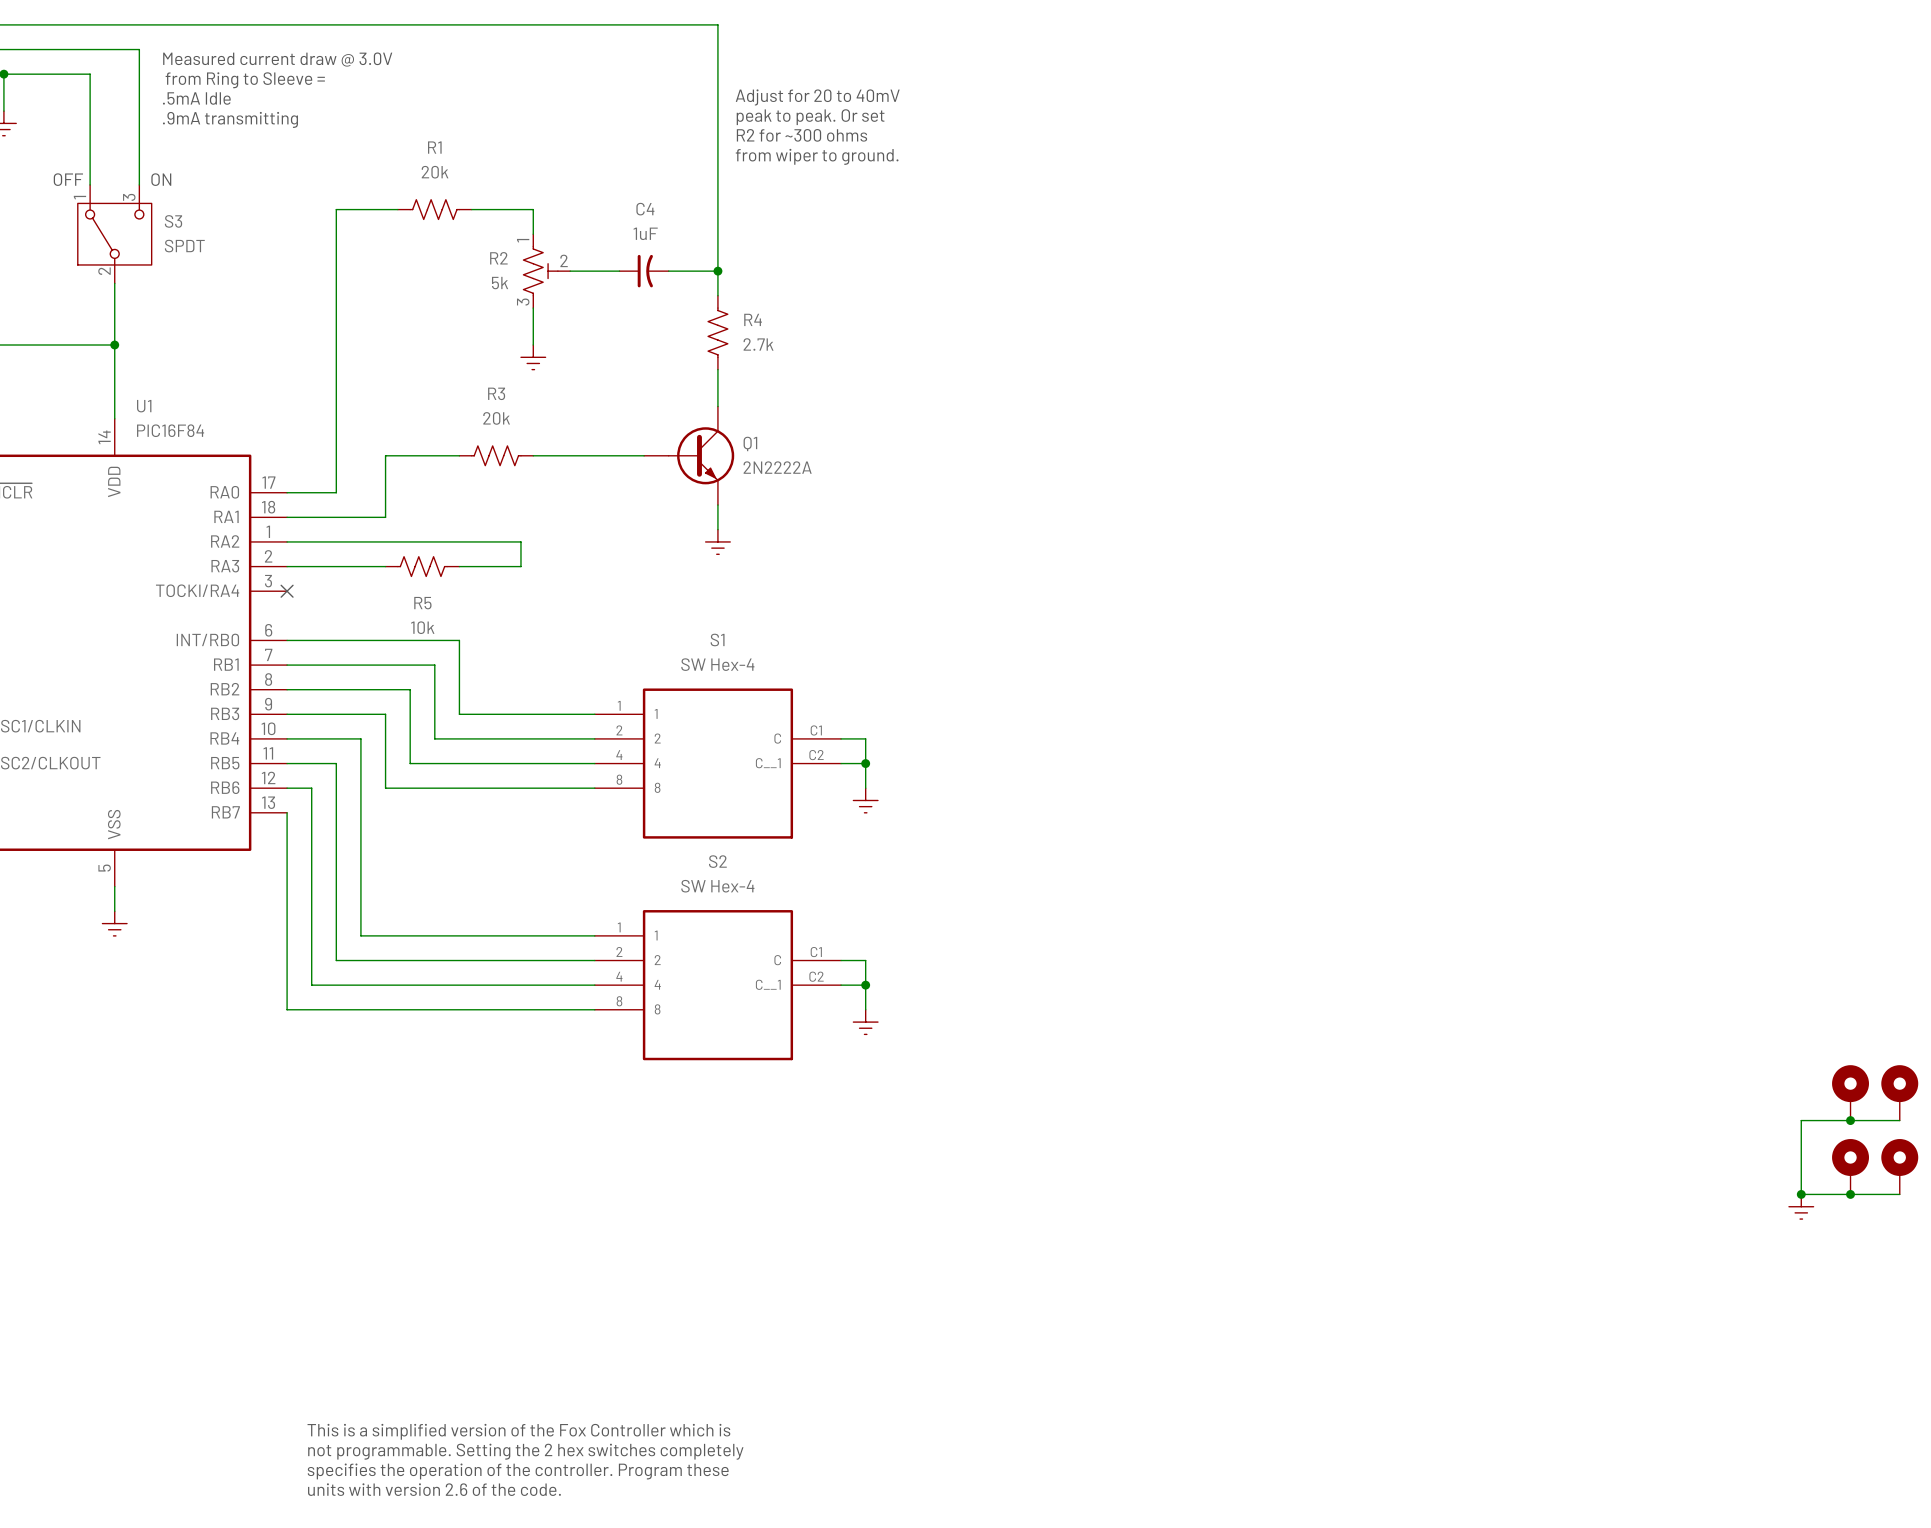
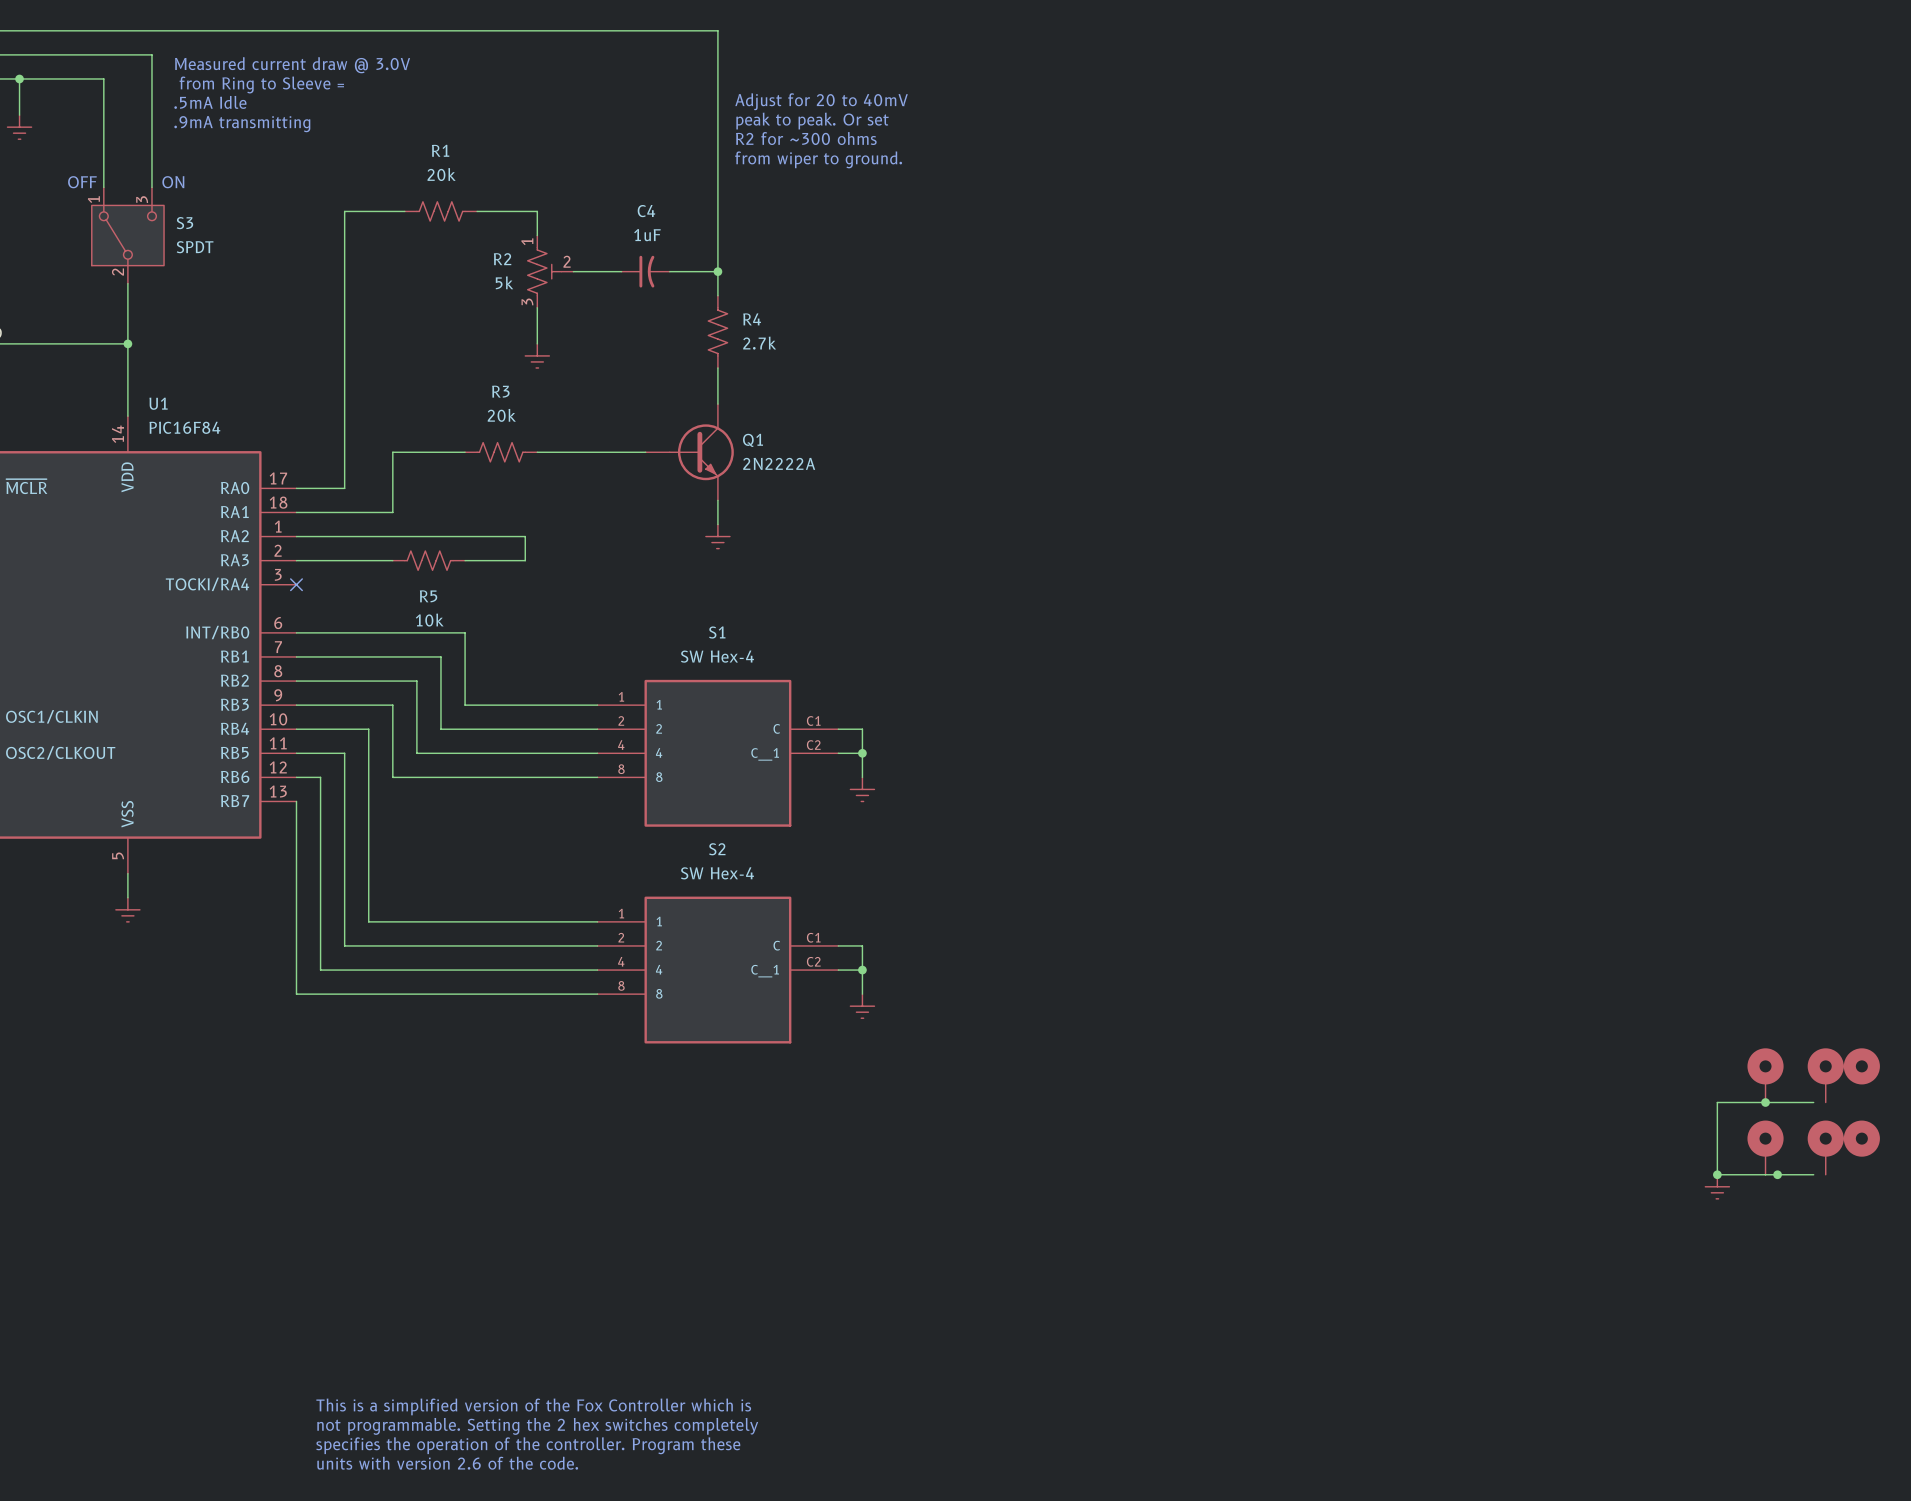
part: none -> (1861, 1066)
part: none -> (1765, 1075)
part: (1899, 1092) -> none
junction: none -> (1765, 1102)
wire: (1801, 1120) (1801, 1194) -> (1777, 1102) (1717, 1102) (1717, 1174) (1777, 1174)
wire: (1838, 1120) (1899, 1120) -> none
junction: (1850, 1120) -> none
part: none -> (1861, 1138)
part: none -> (1765, 1147)
part: (1899, 1166) -> none
junction: none -> (1717, 1174)
wire: (1838, 1194) (1899, 1194) -> none
junction: (1850, 1194) -> none
power symbol position: (1801, 1206) -> (1717, 1186)

